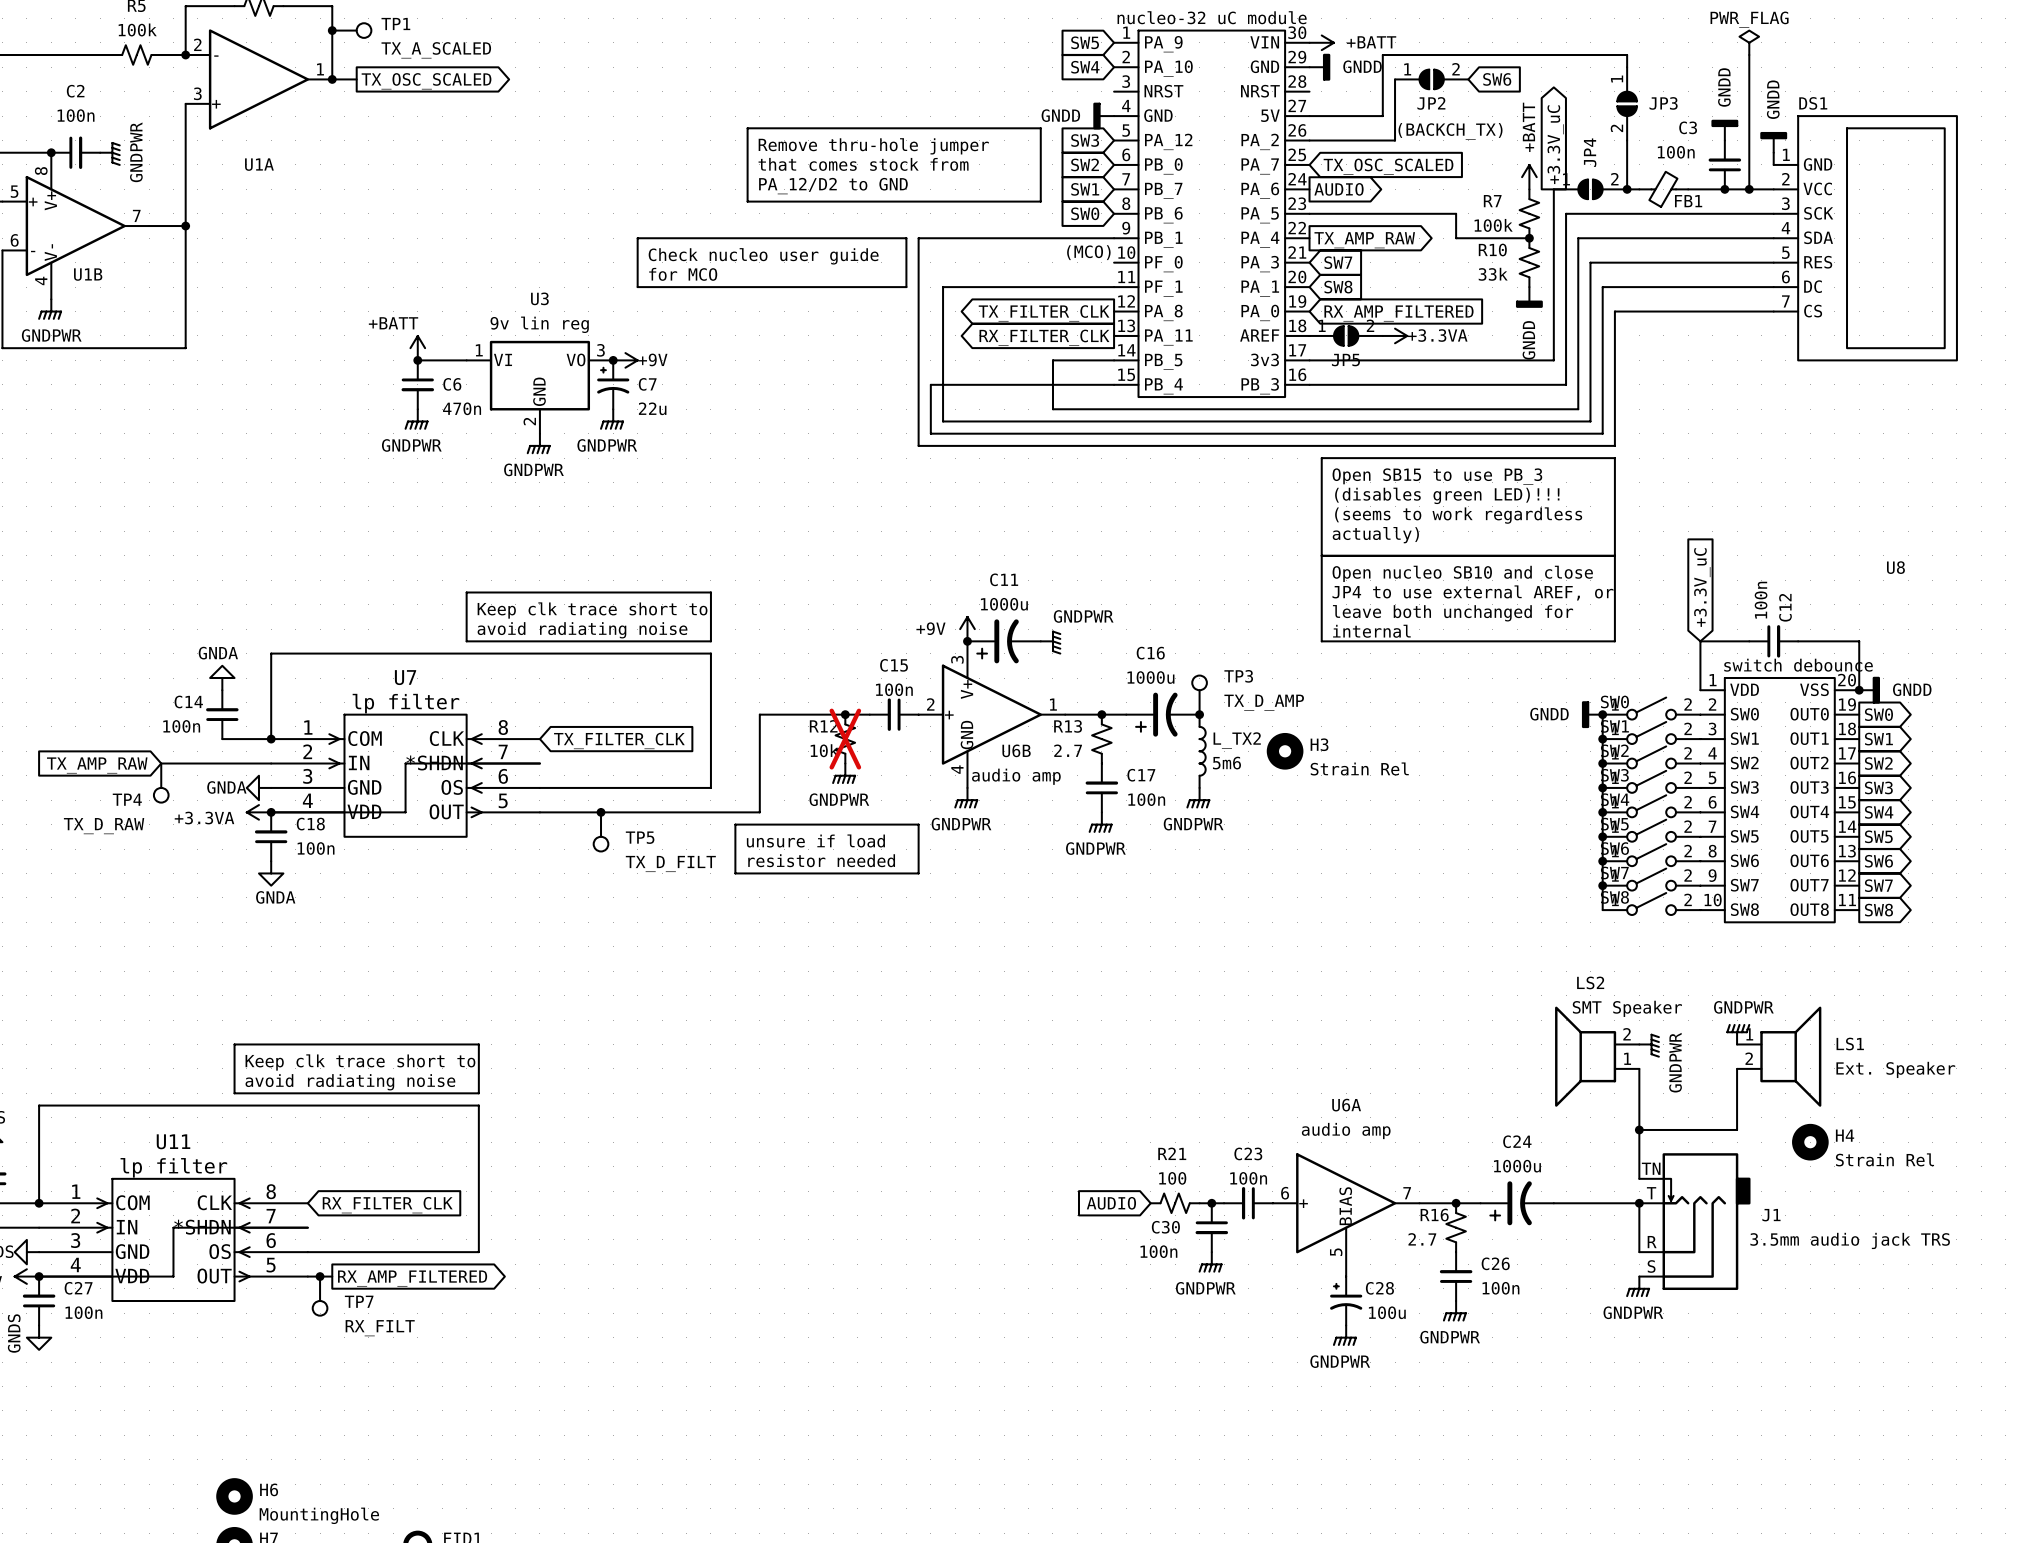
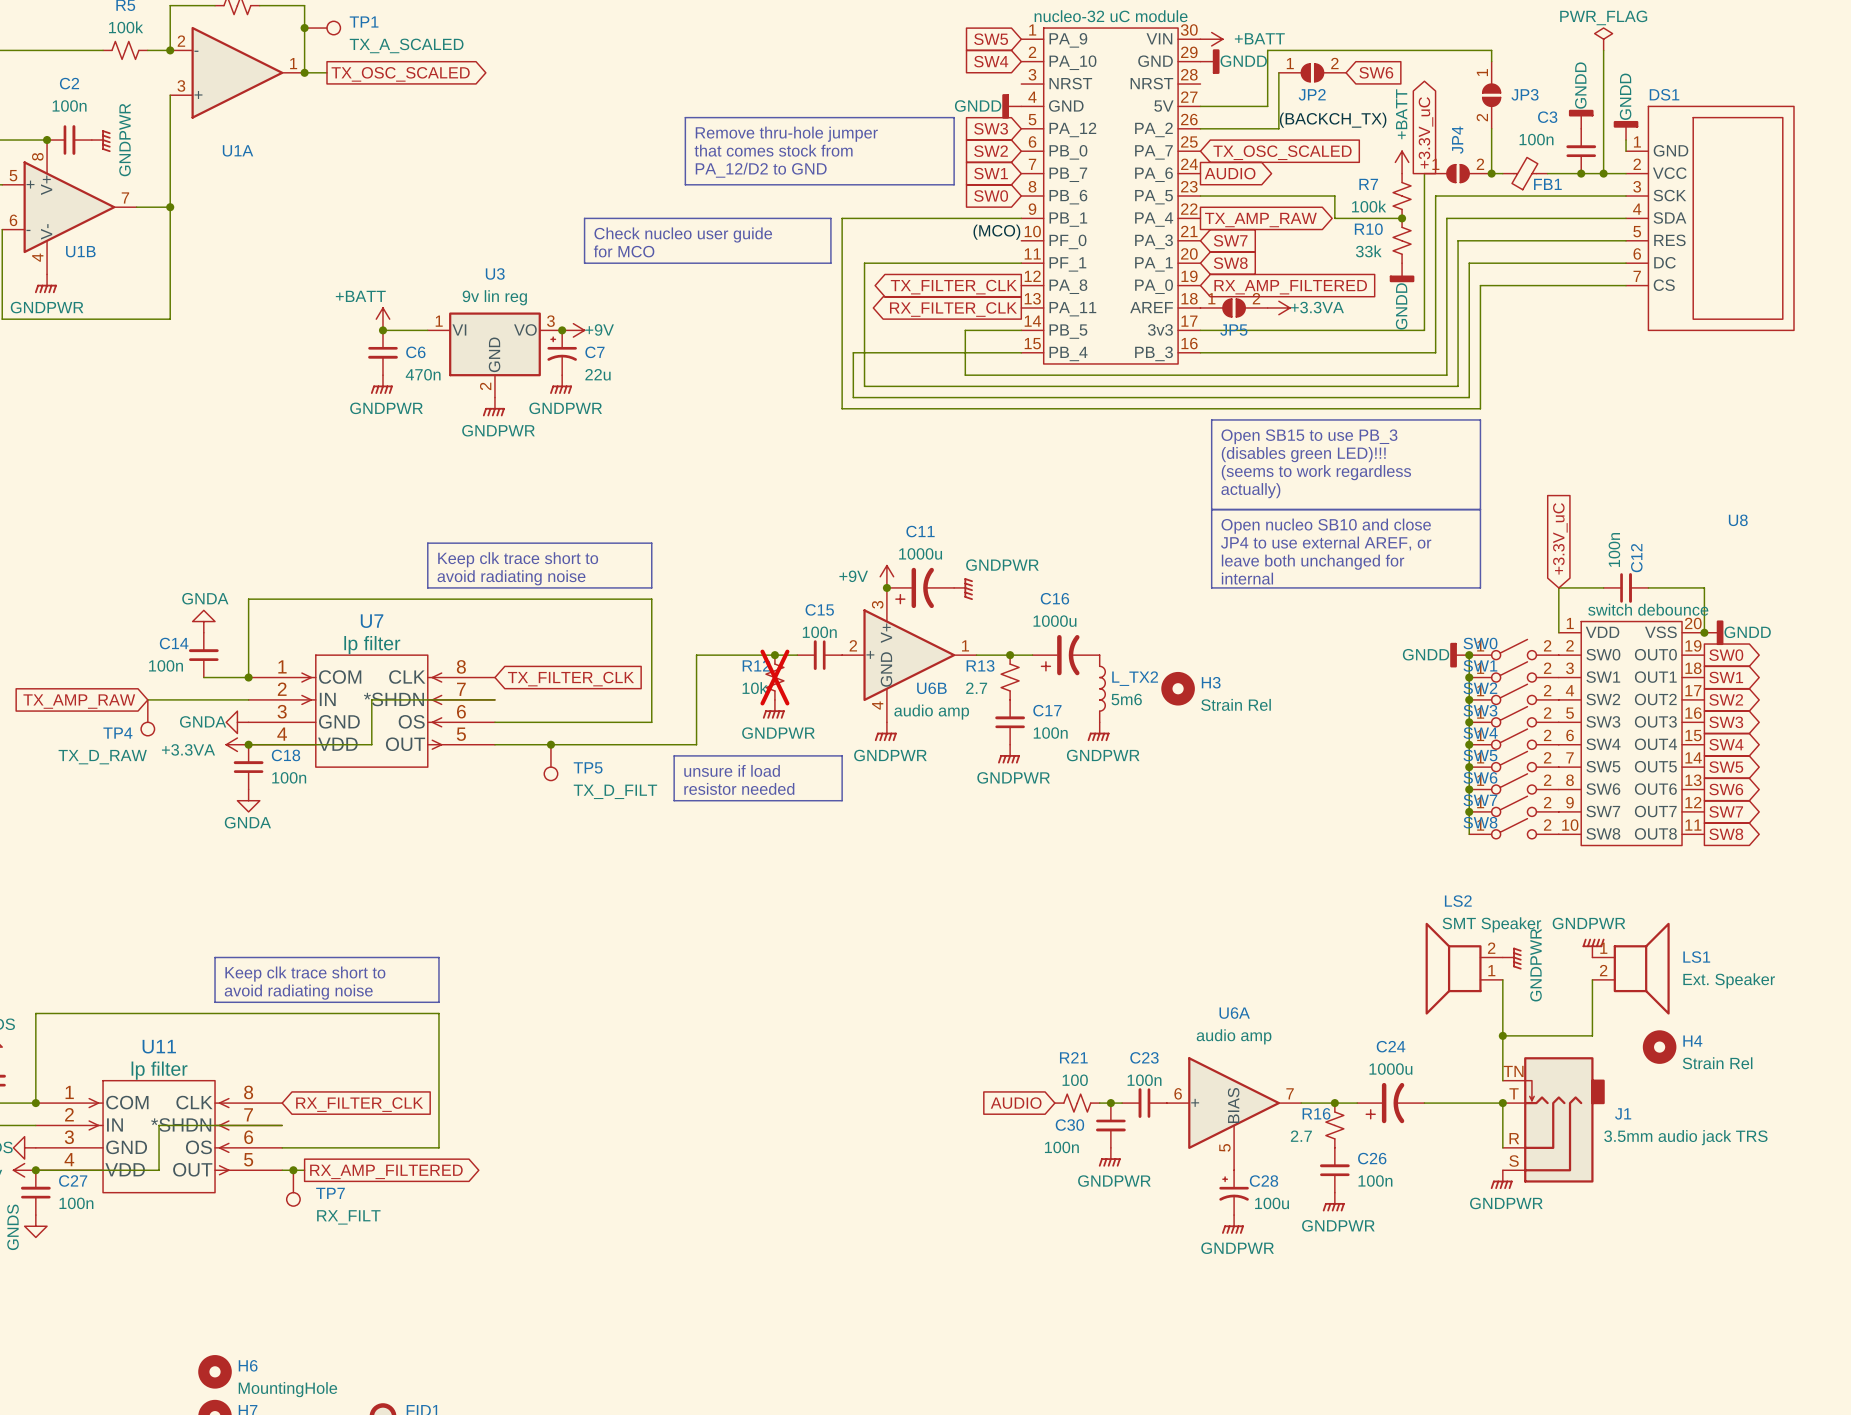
TP3: TX_D_AMP (1199, 695) -> none
junction: (1199, 714) -> none

